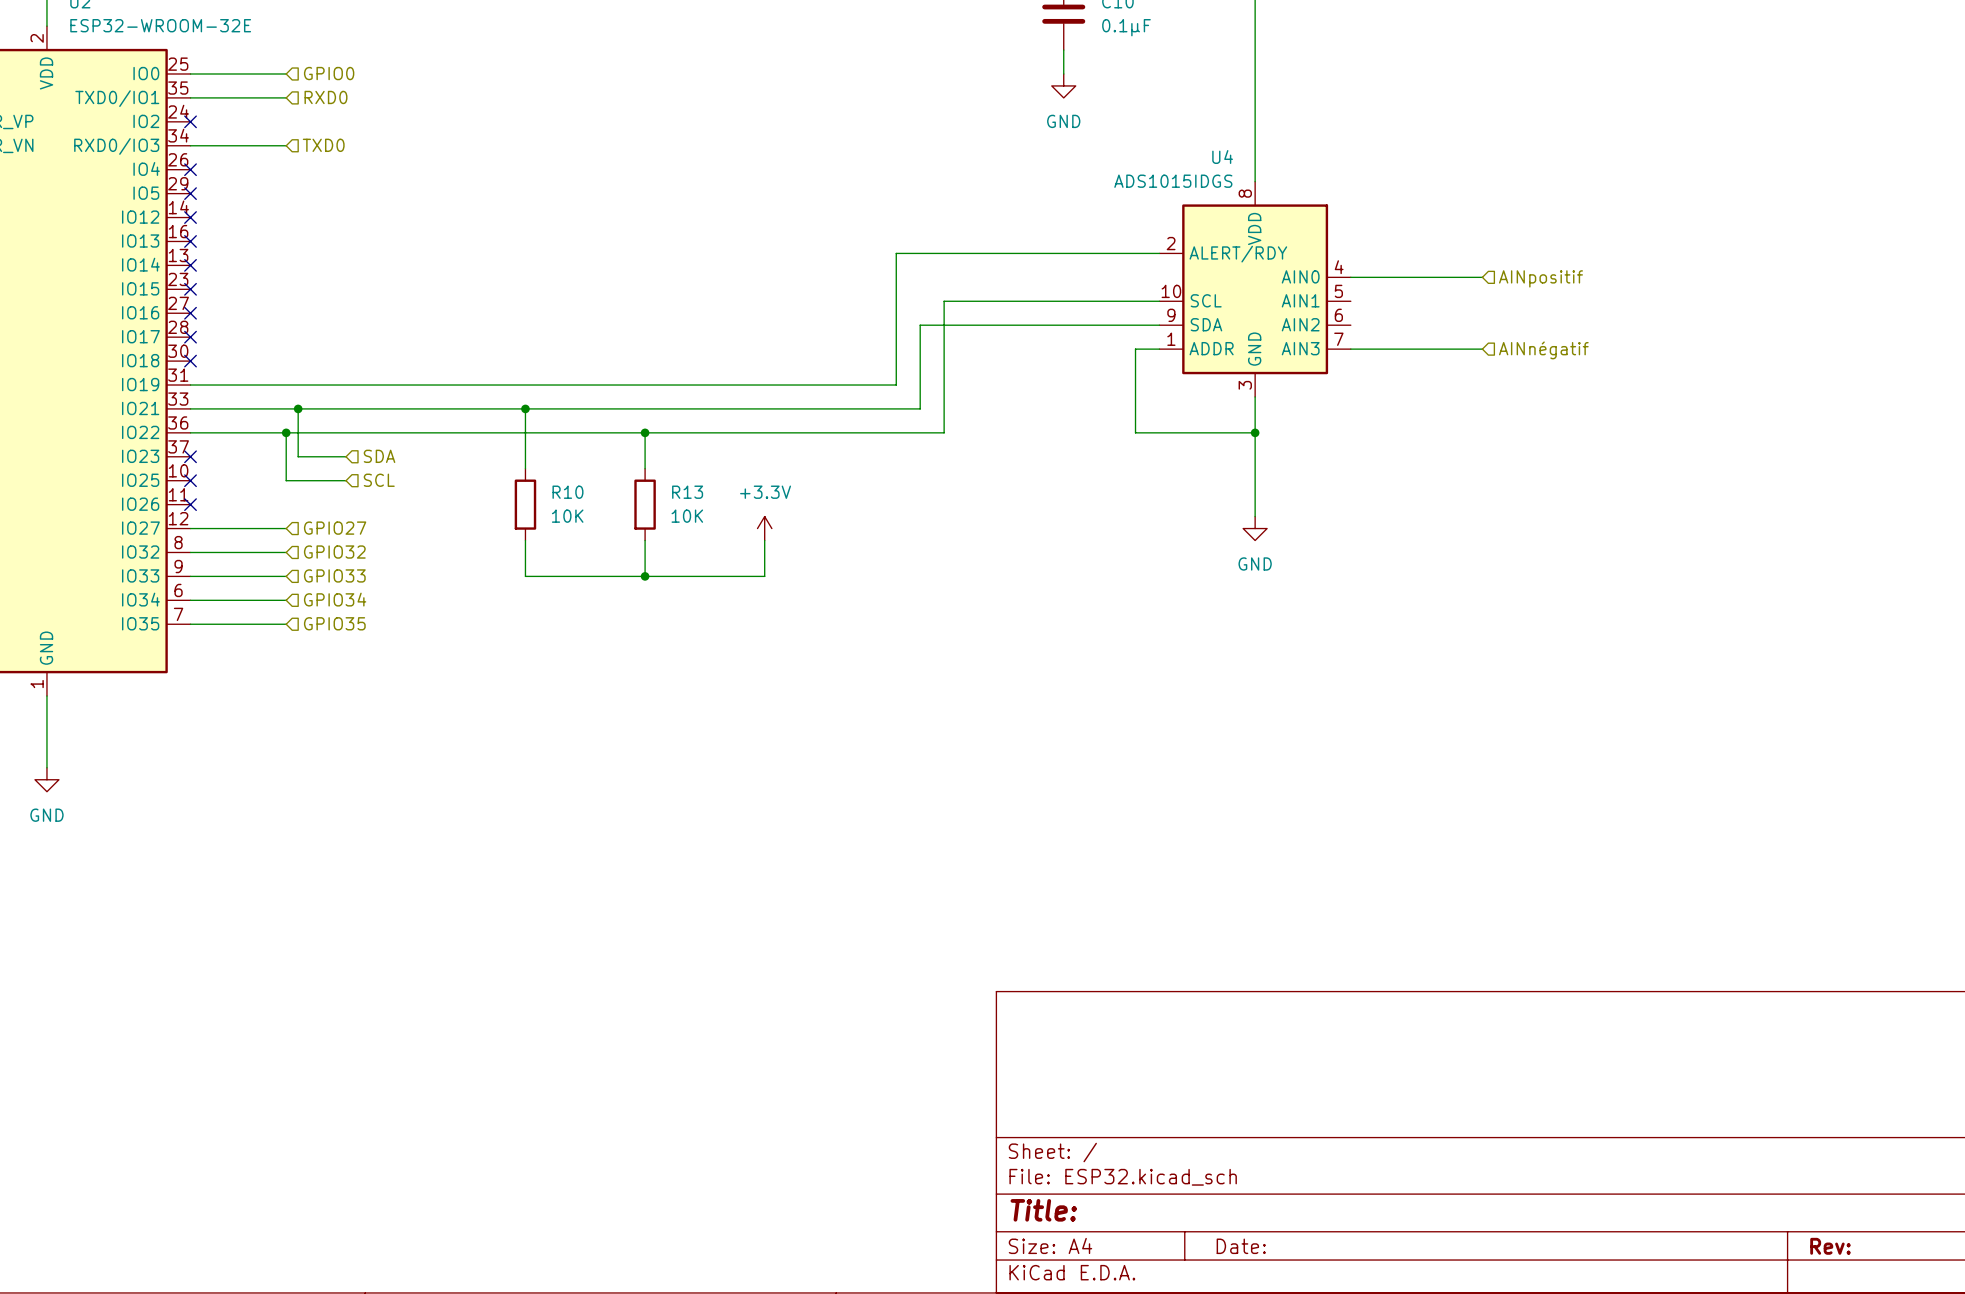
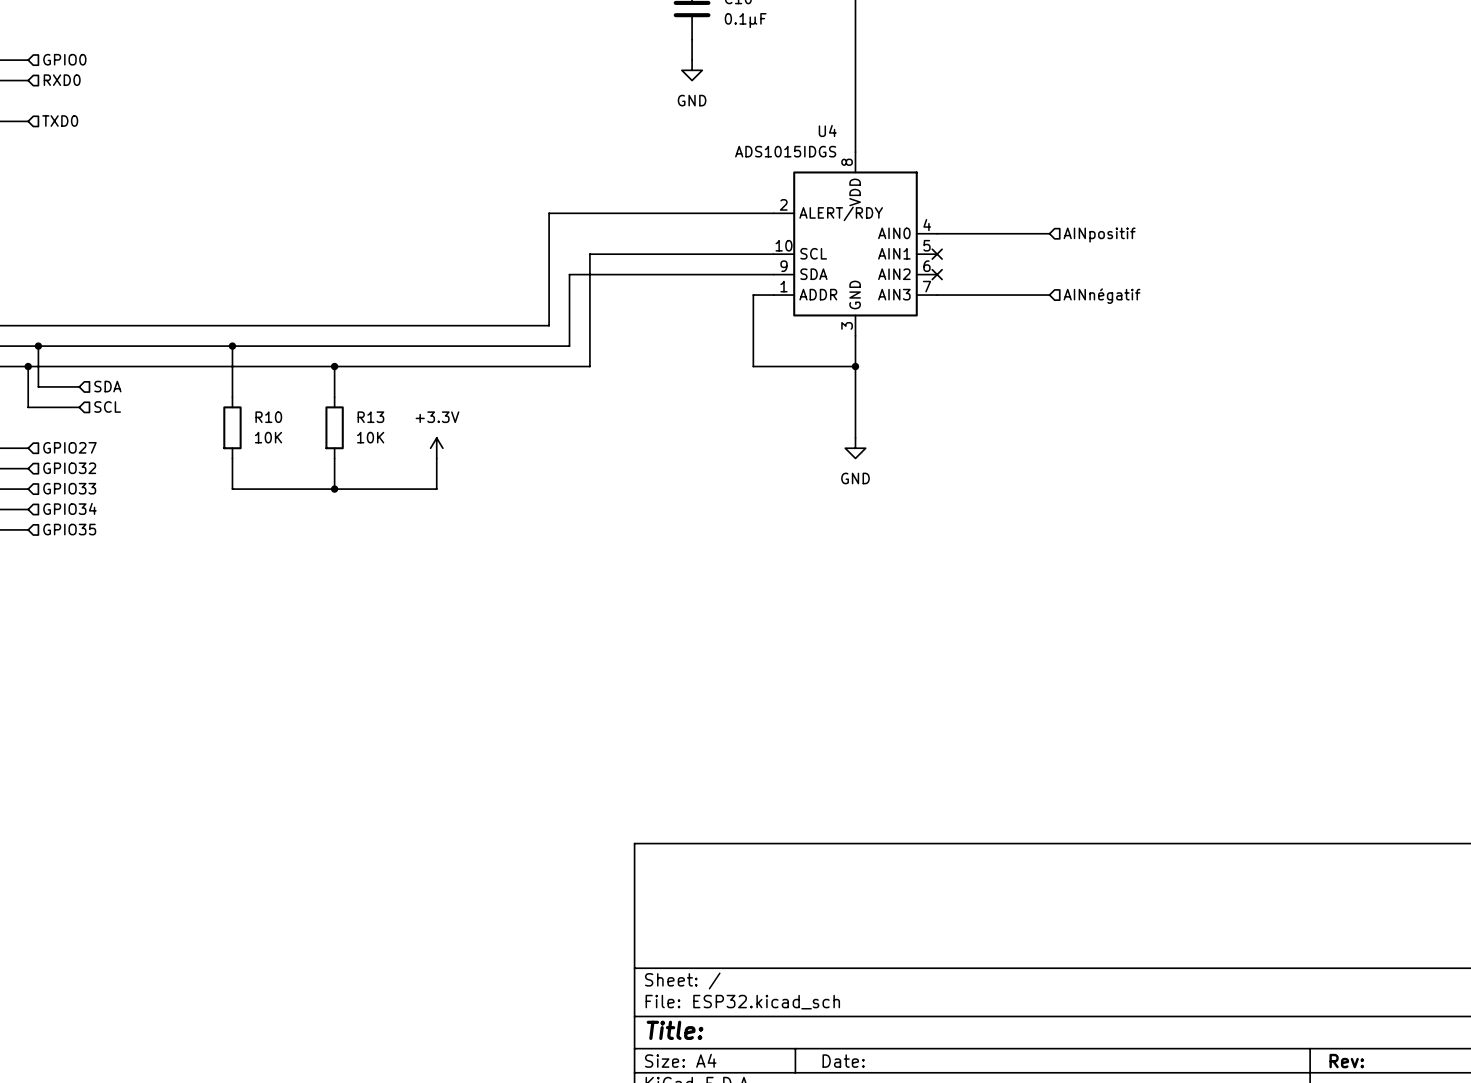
no-connect mark: none -> (937, 254)
no-connect mark: none -> (937, 274)

